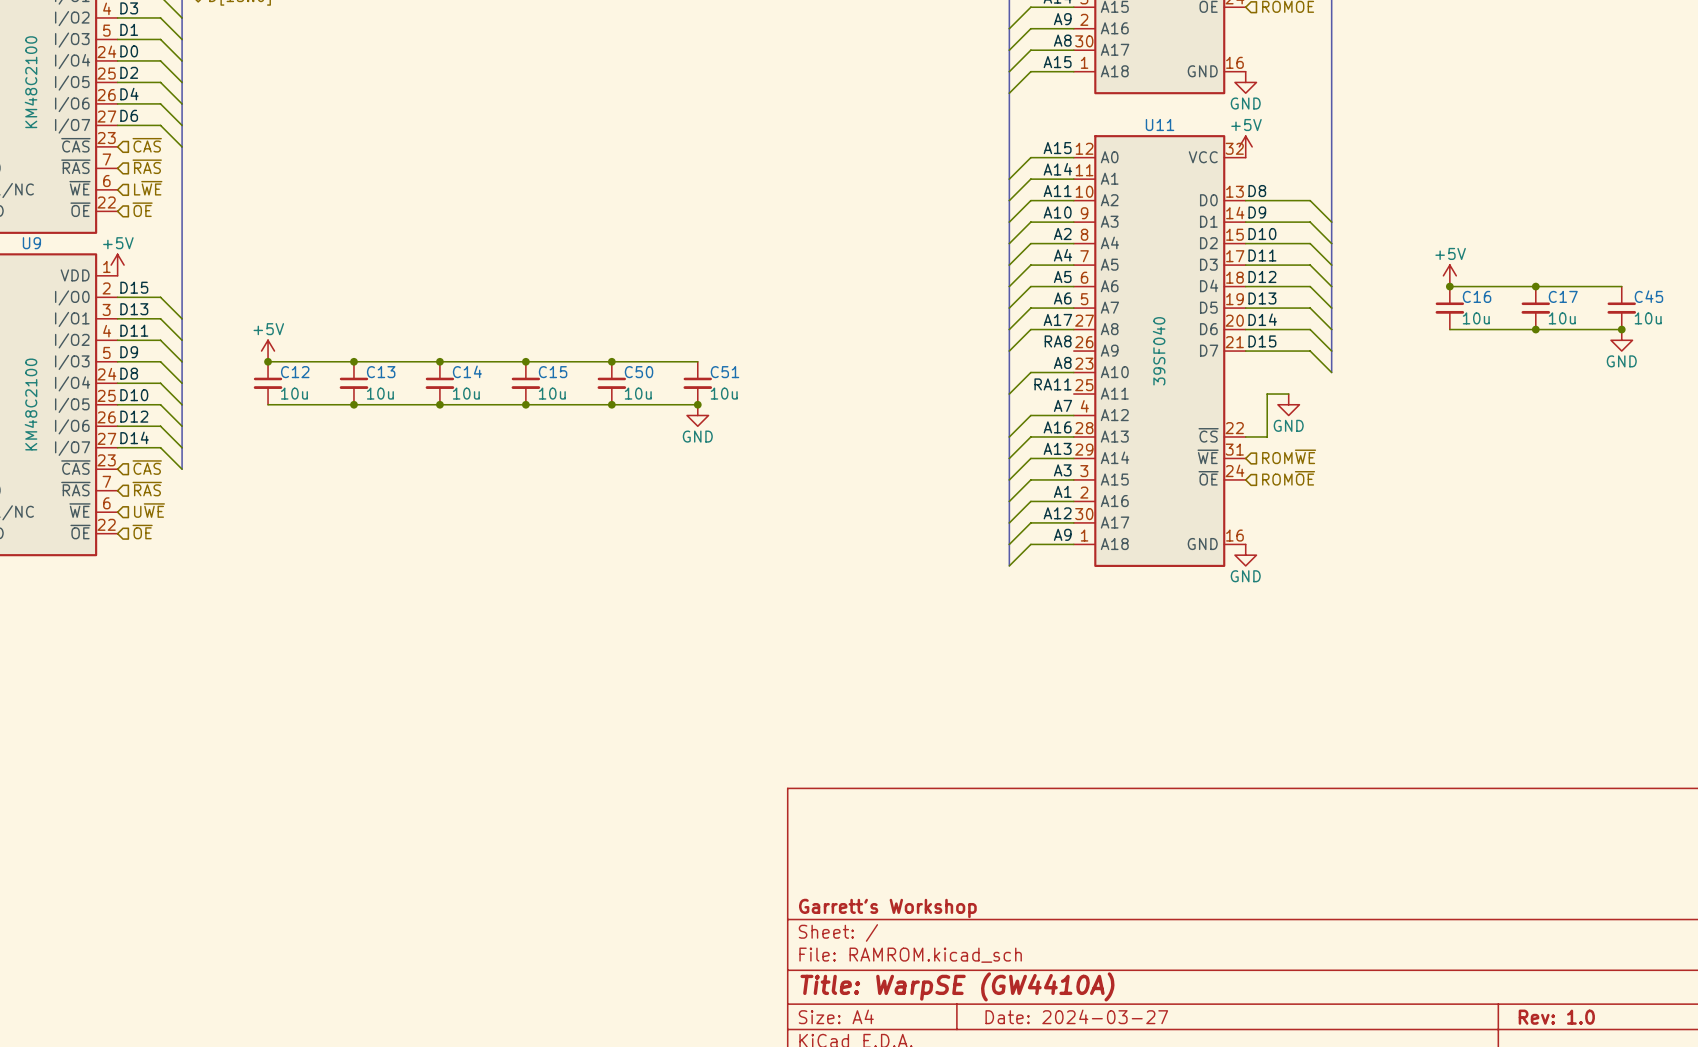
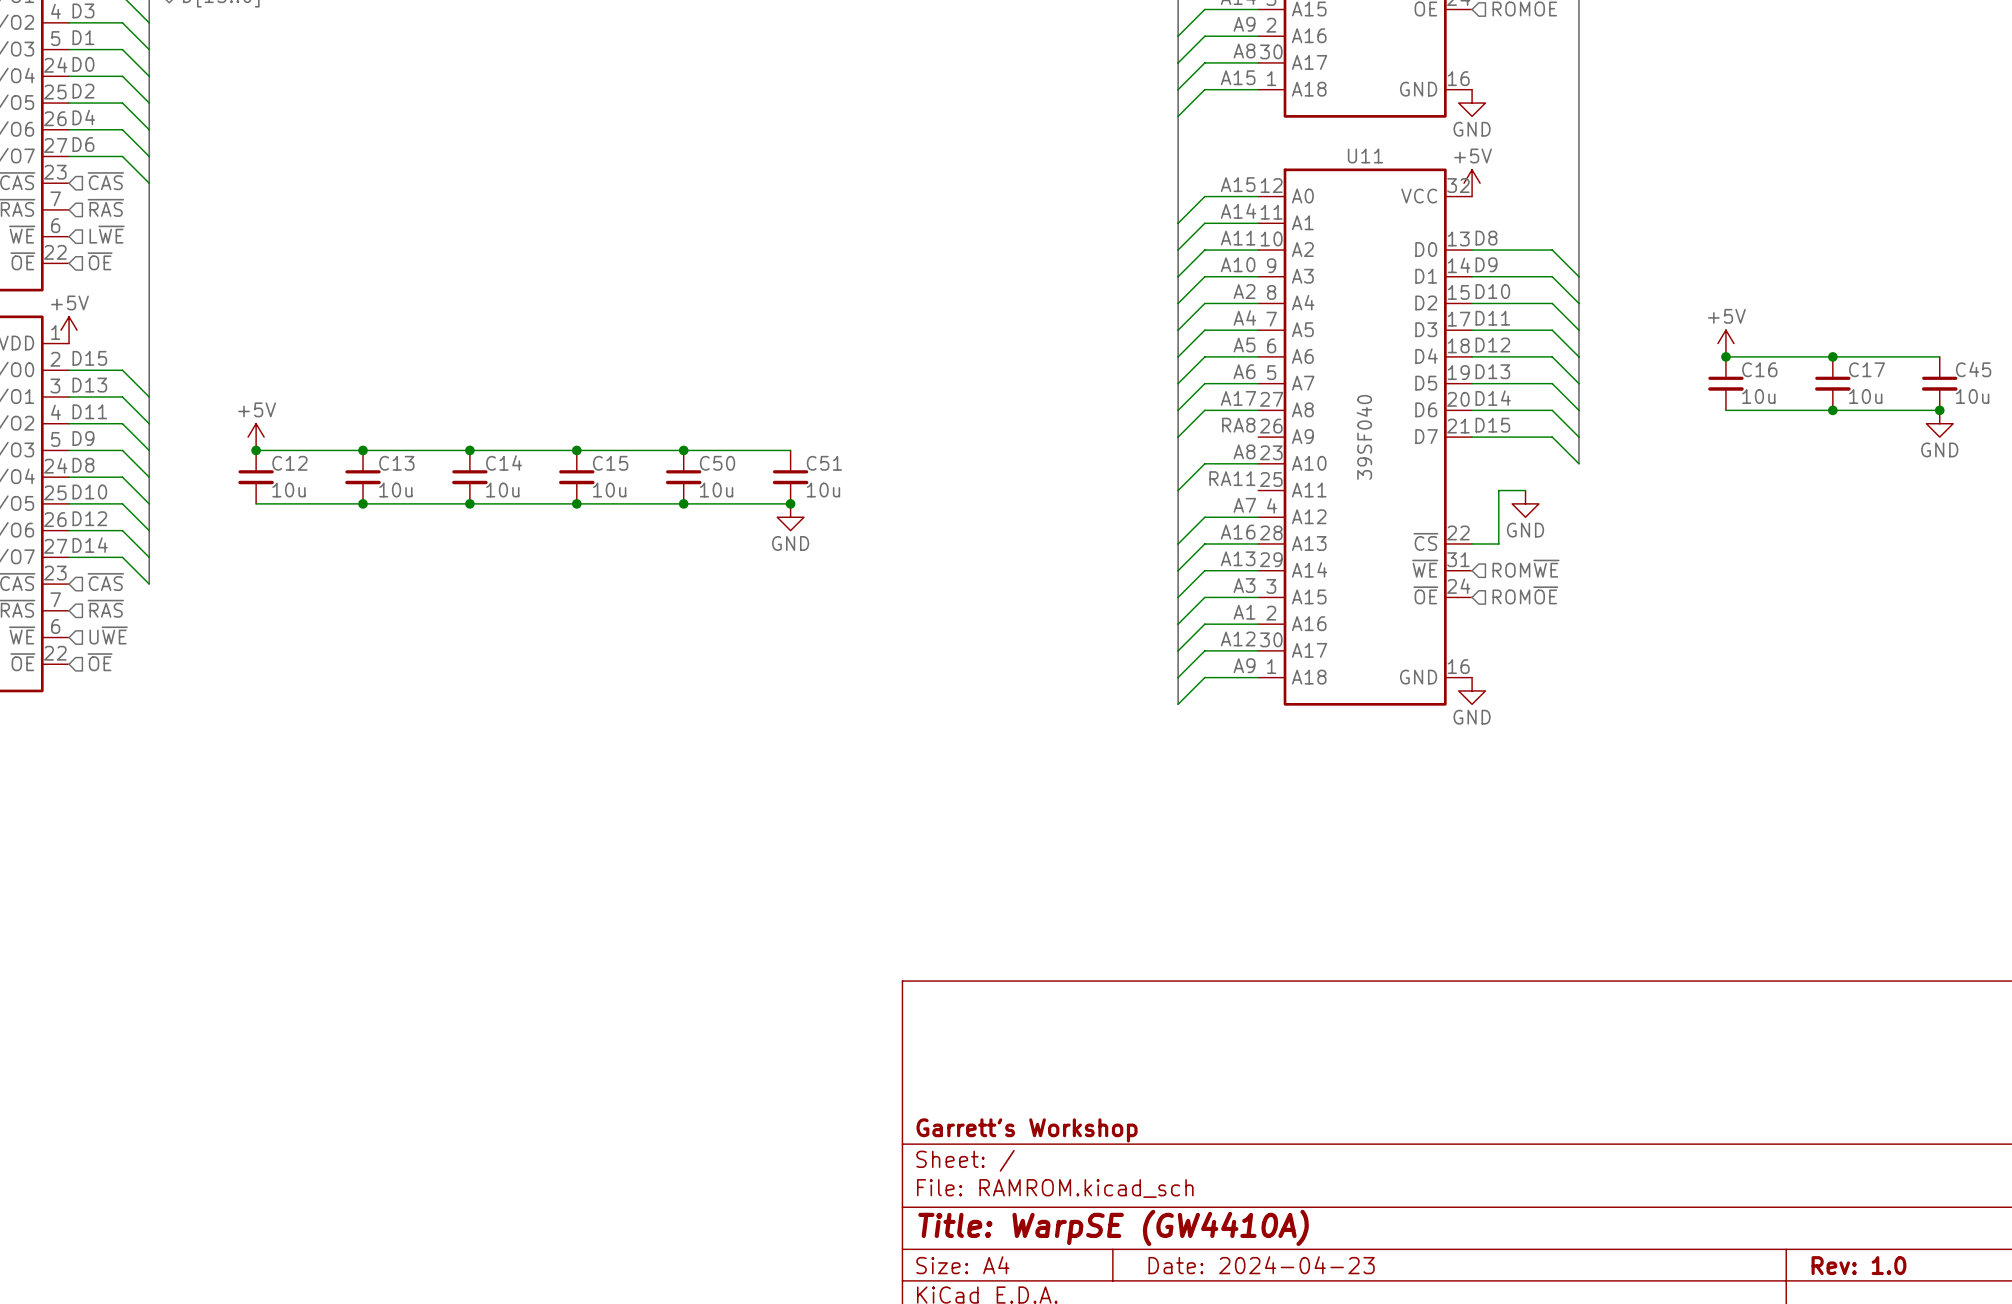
title block: Date: 2024-03-27 (1076, 1016) -> Date: 2024-04-23 (1261, 1265)

